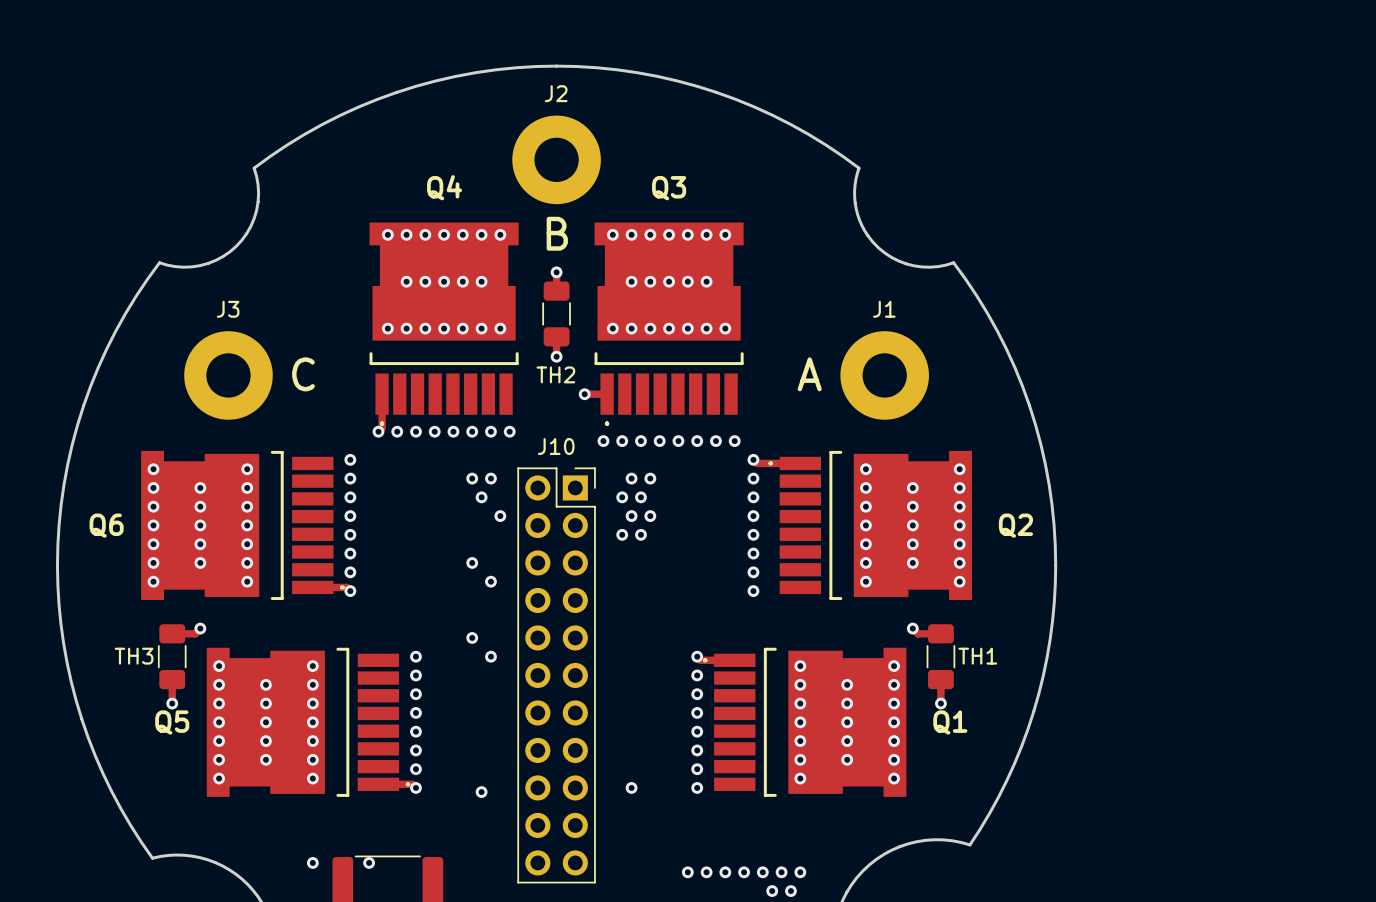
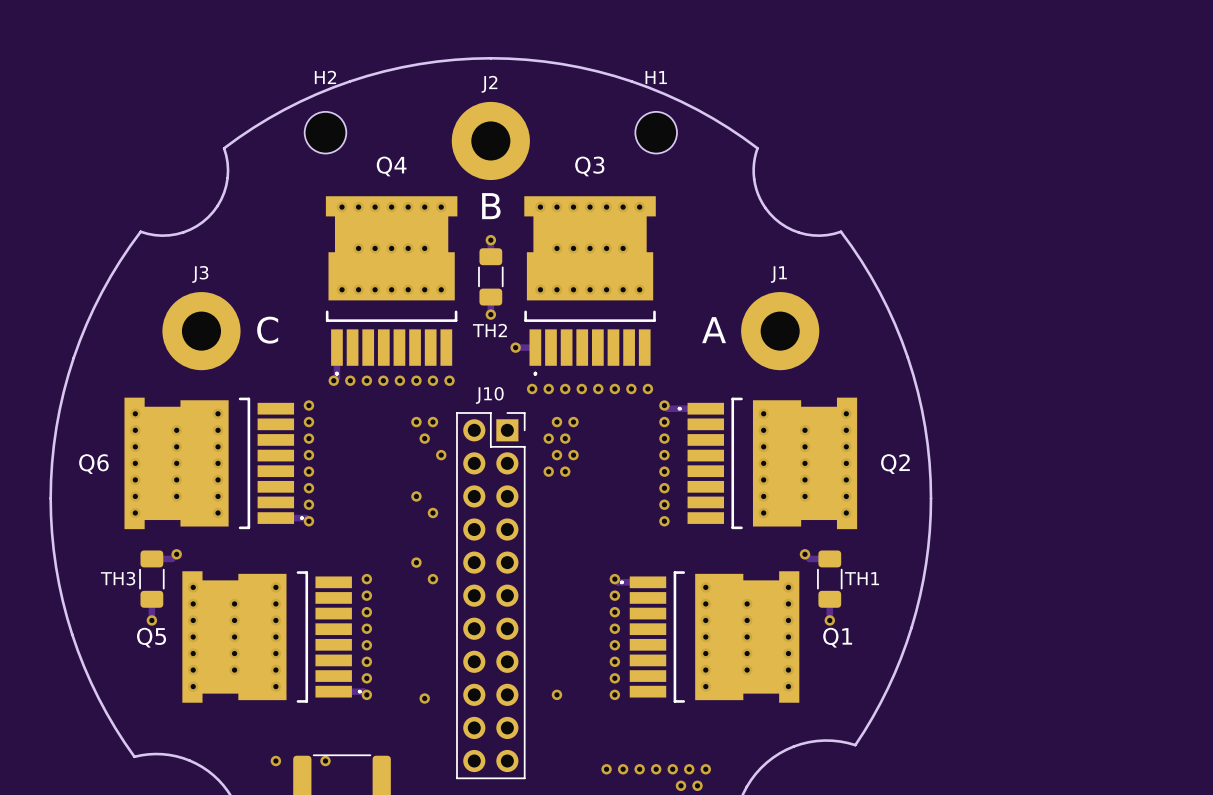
H2: none -> (325, 132)
H1: none -> (656, 132)

